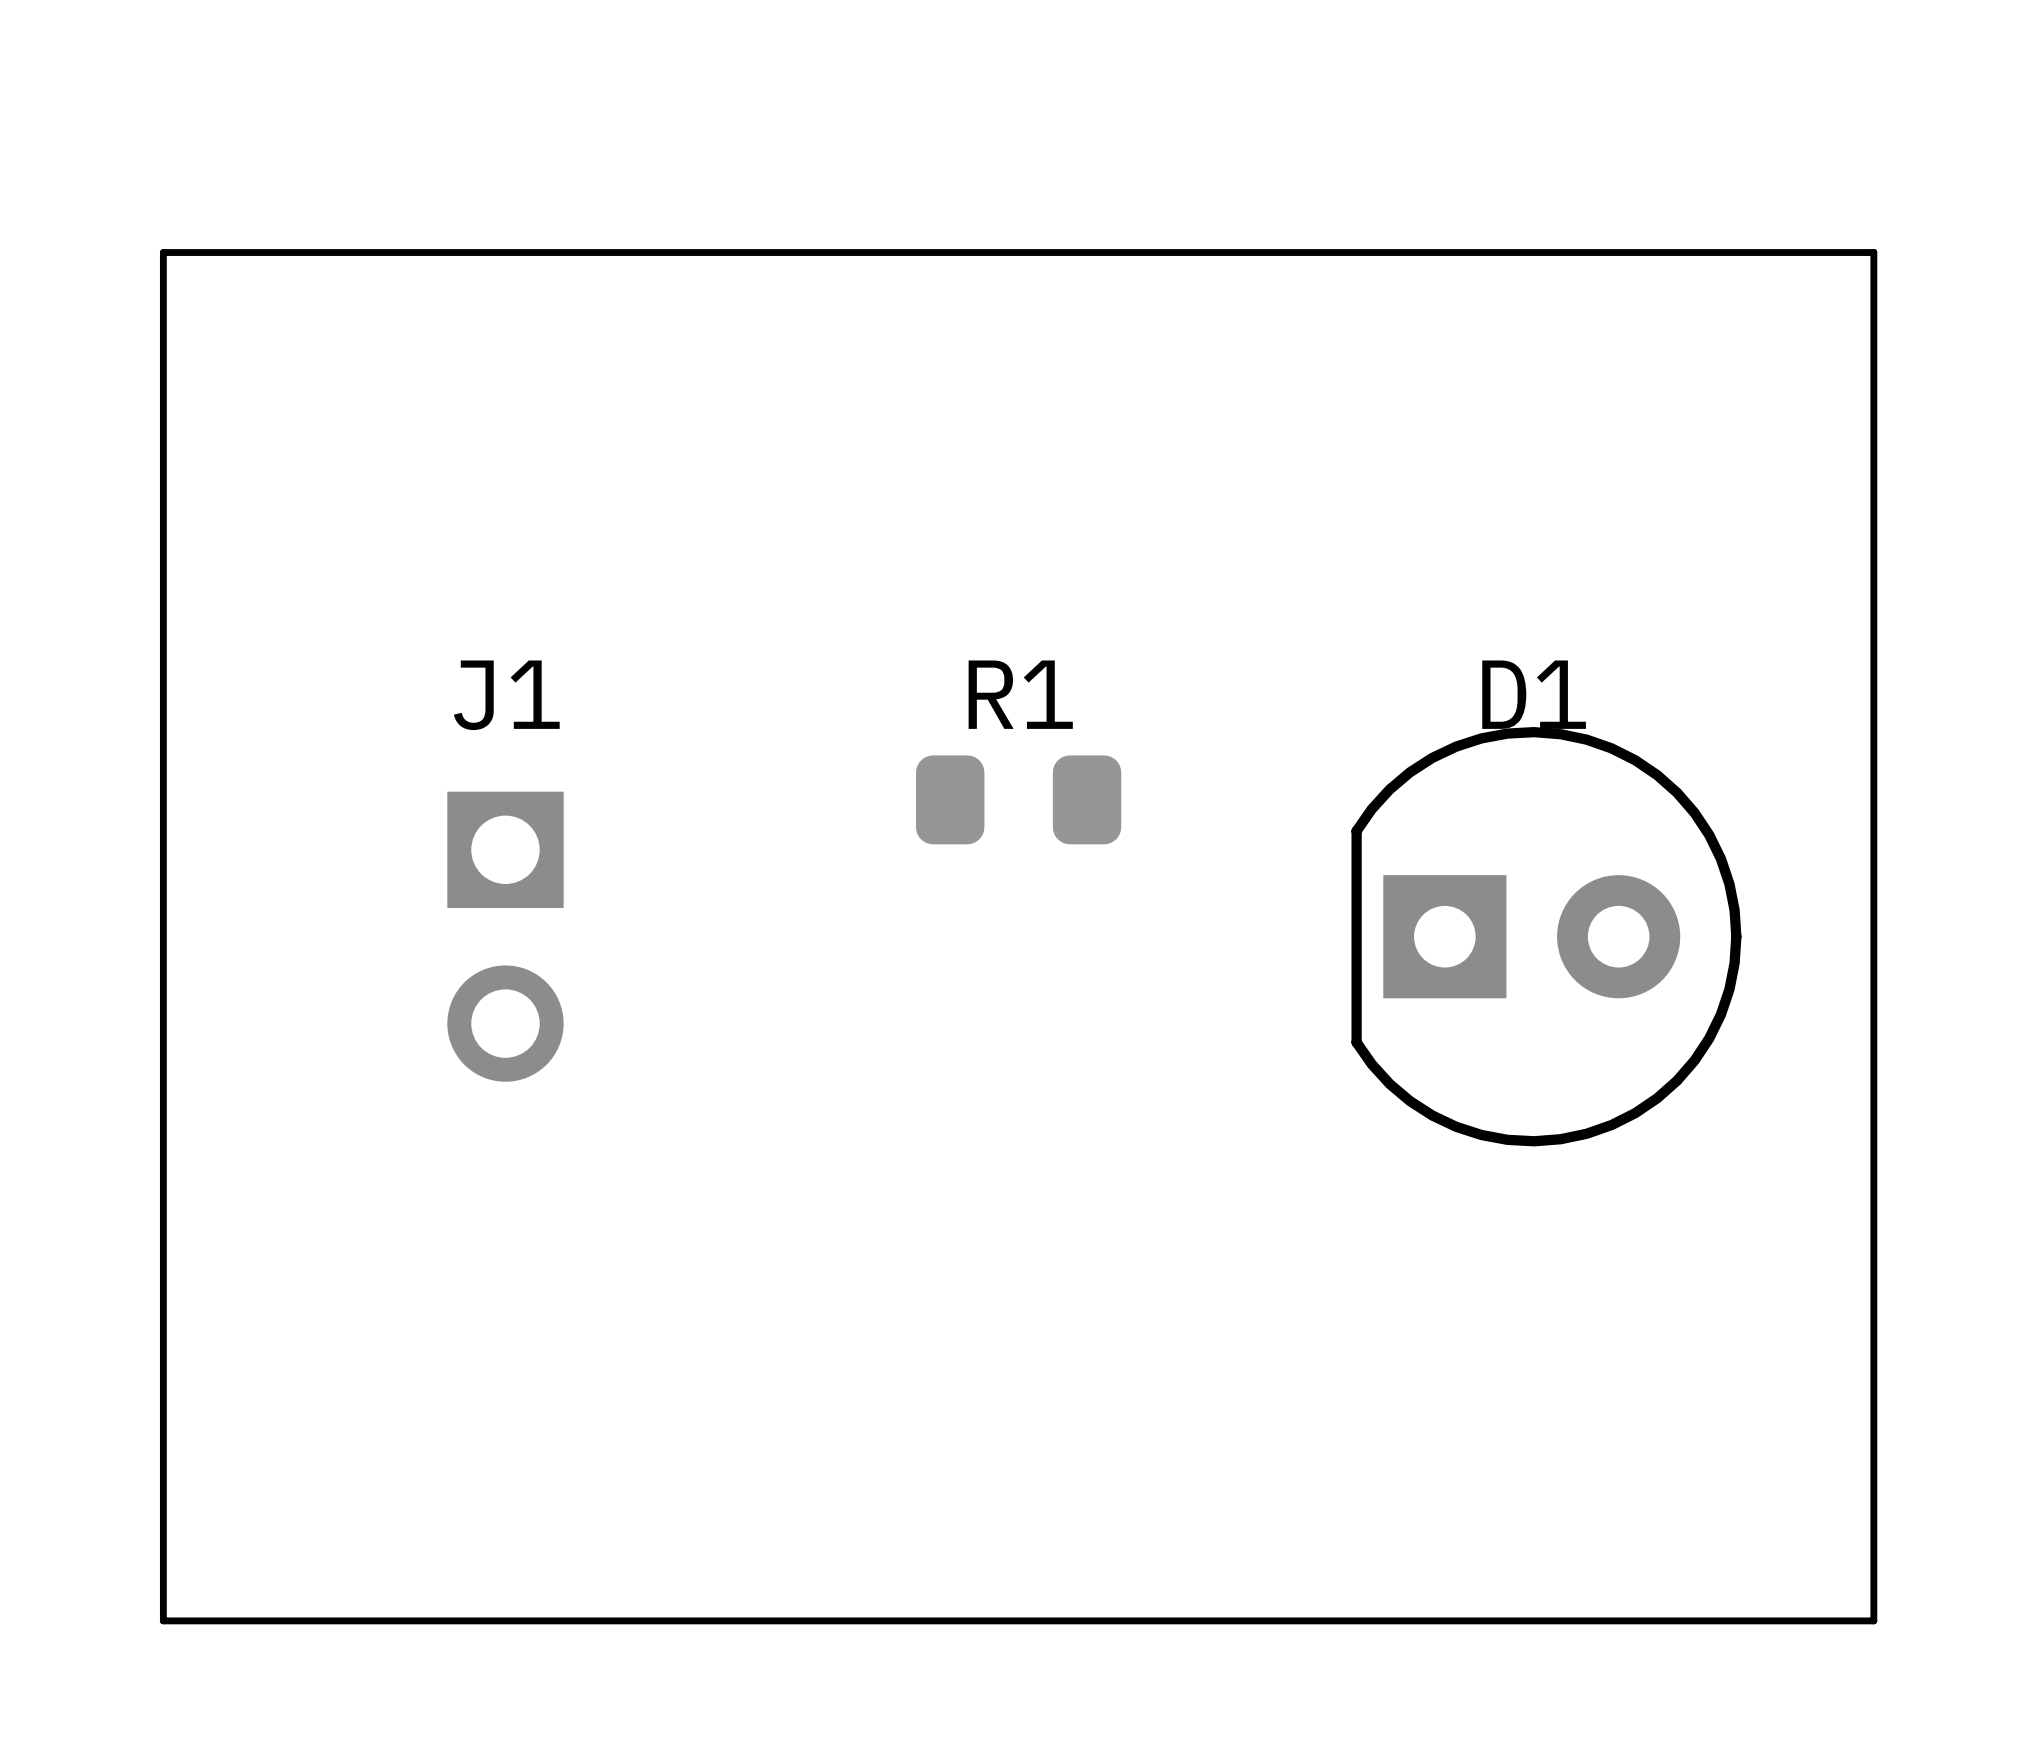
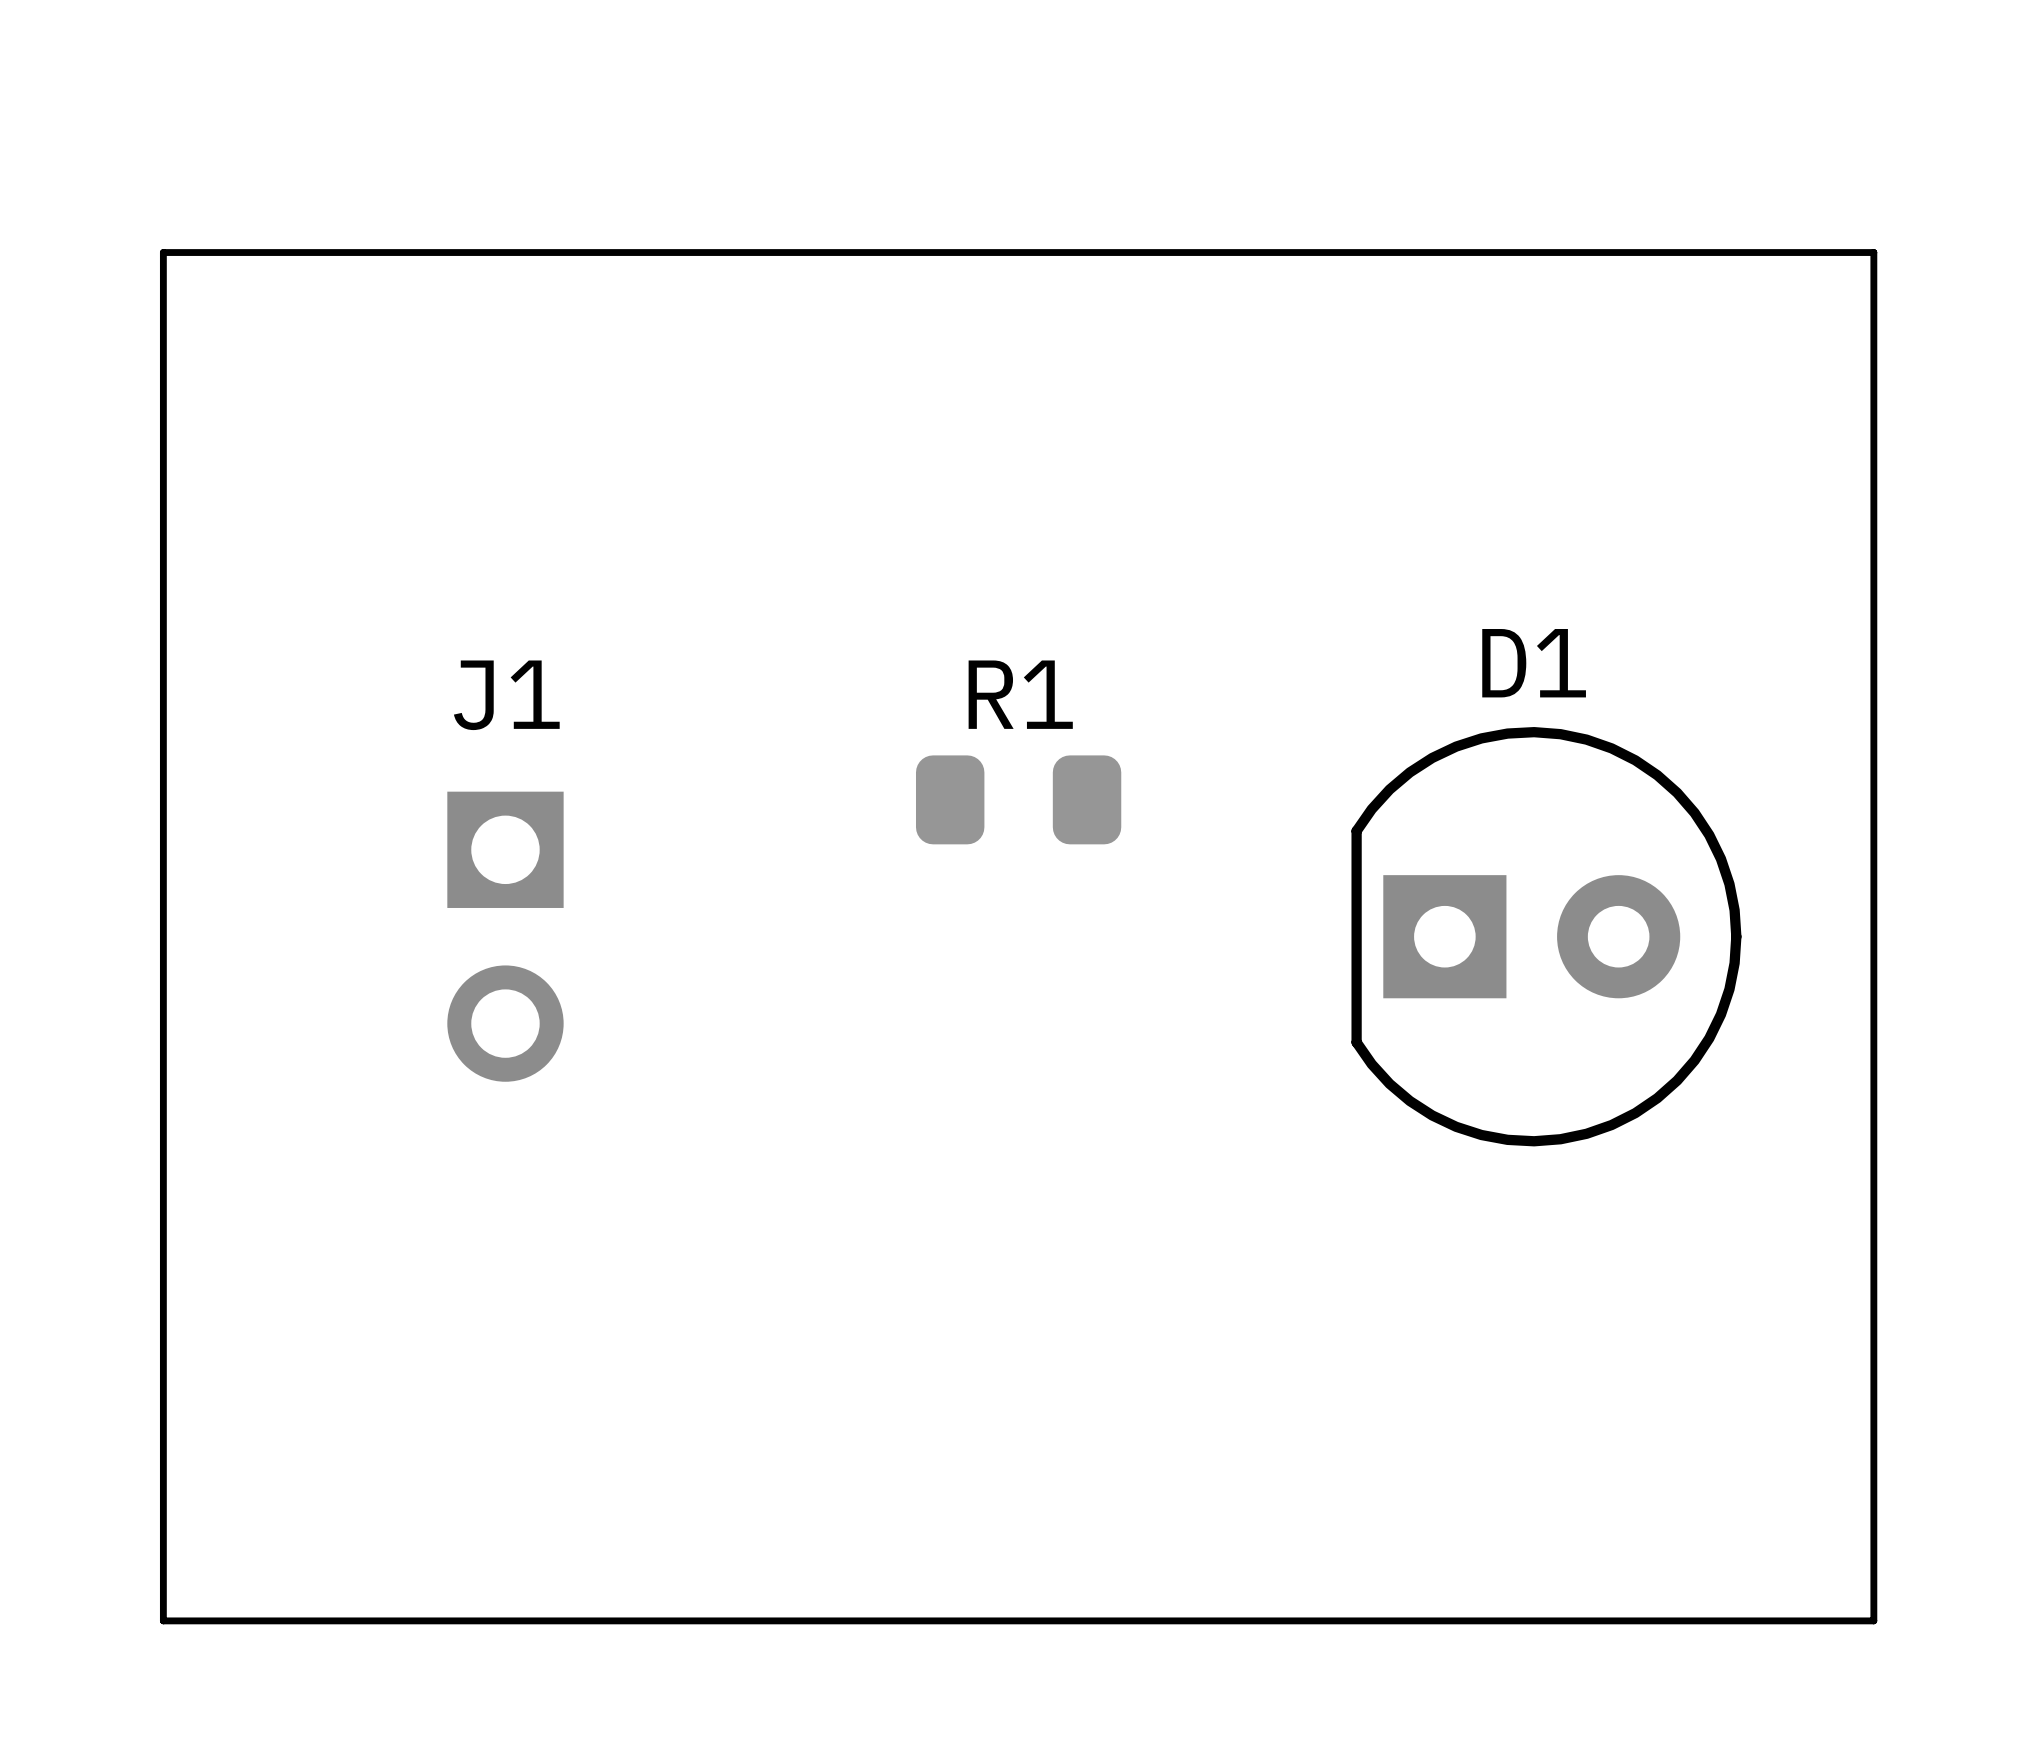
D1 name position: D1 (1534, 694) -> D1 (1534, 663)

